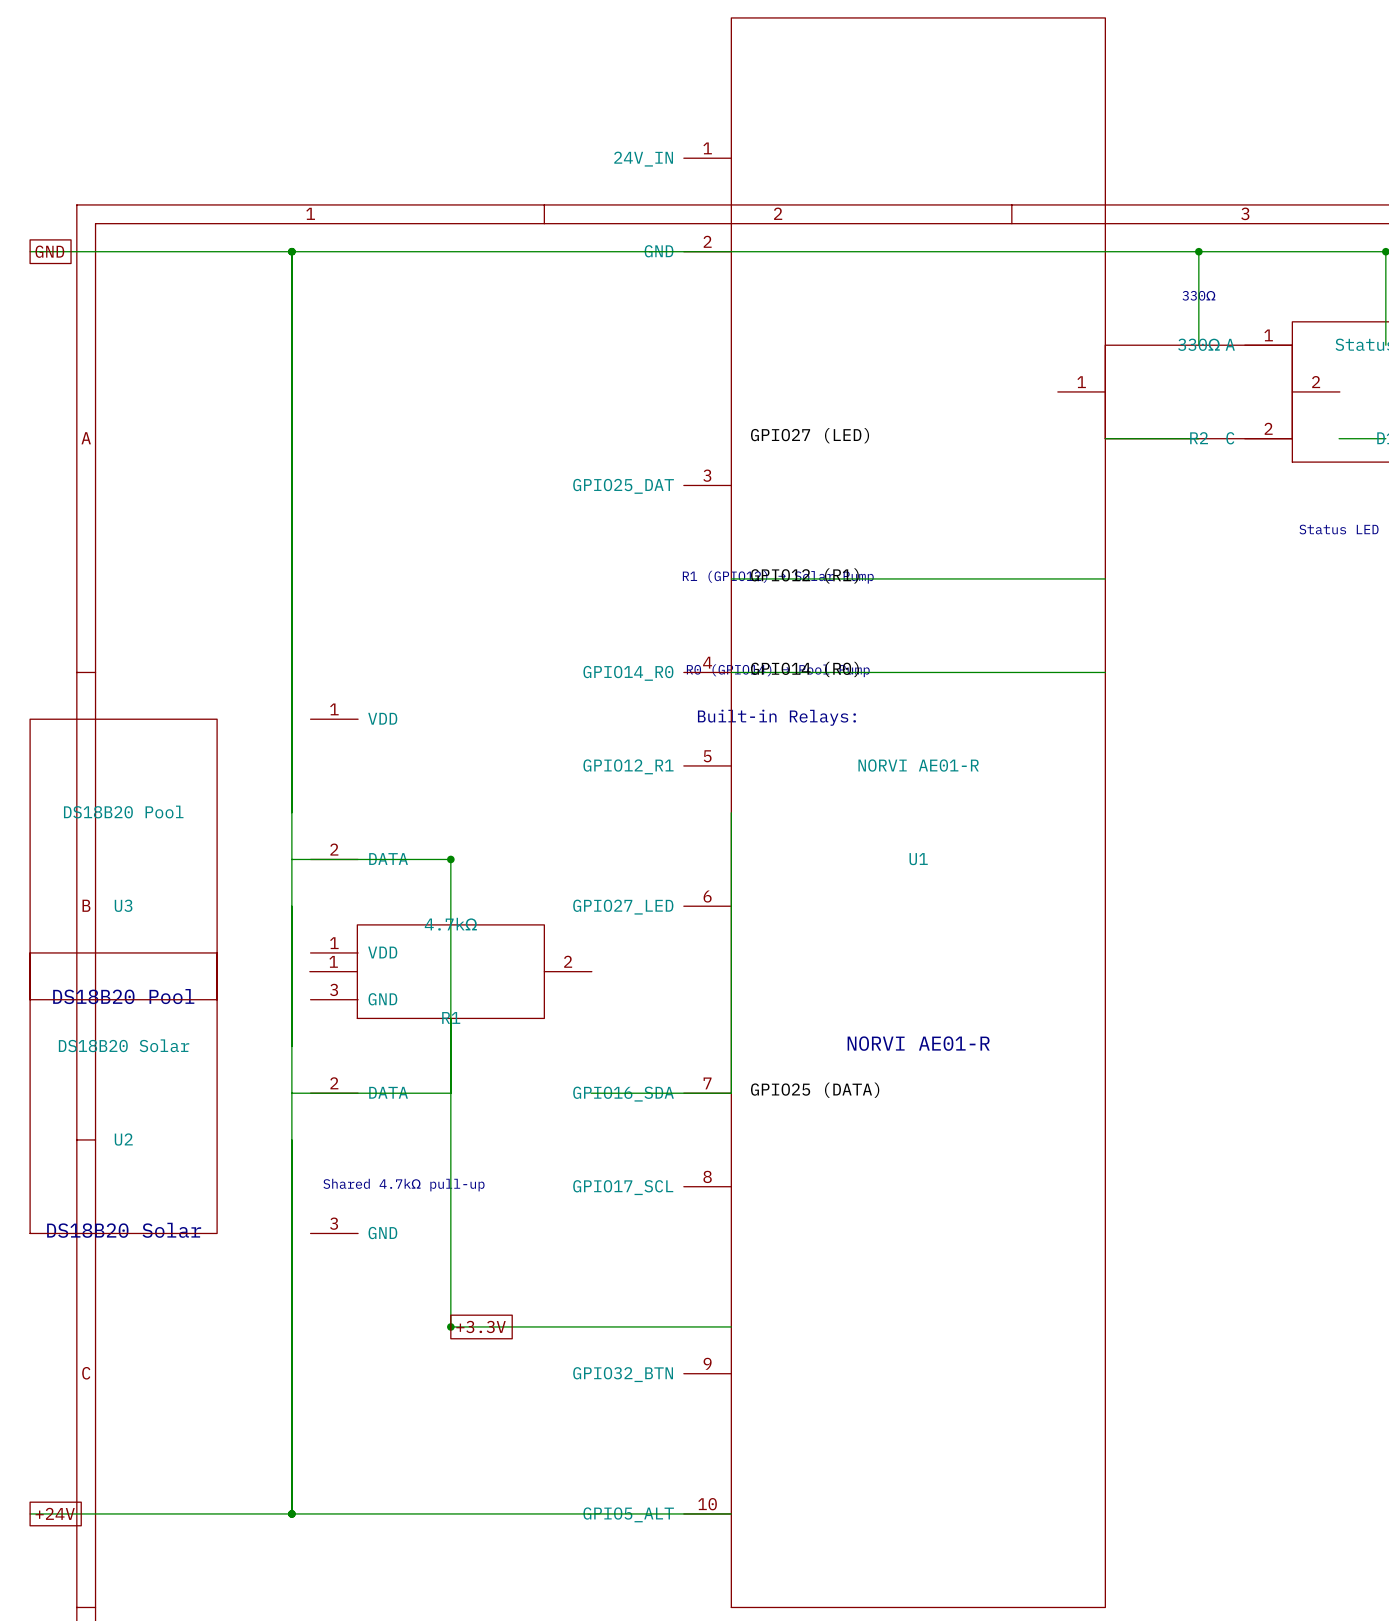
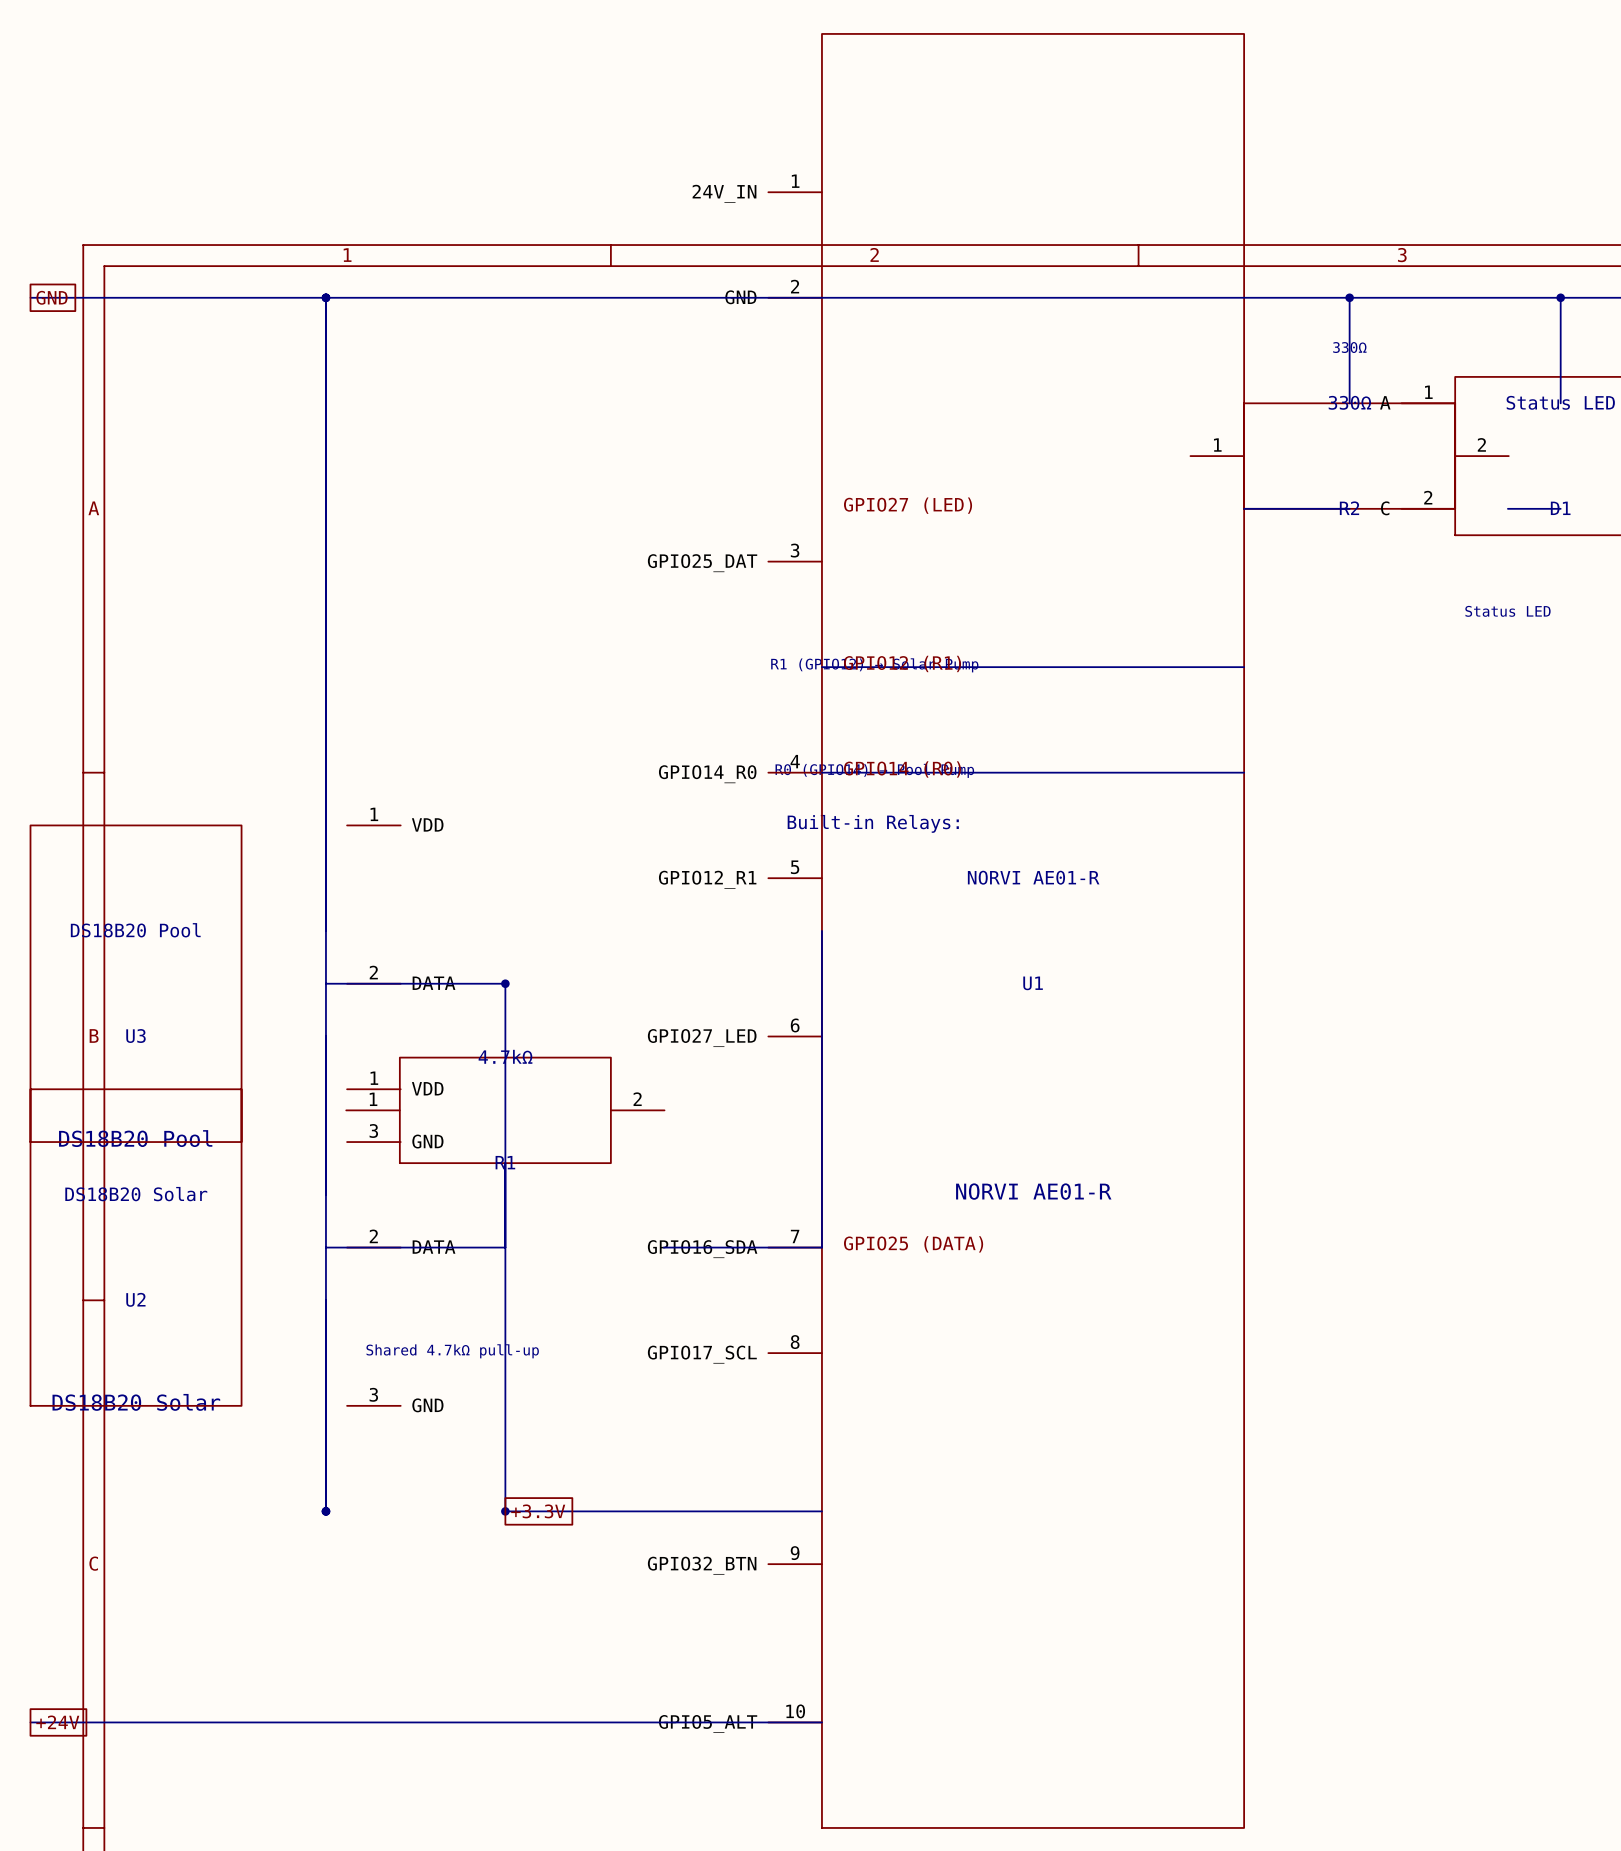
wire: (291, 1326) (291, 1513) -> none
junction: none -> (325, 1511)
junction: (291, 1513) -> none

